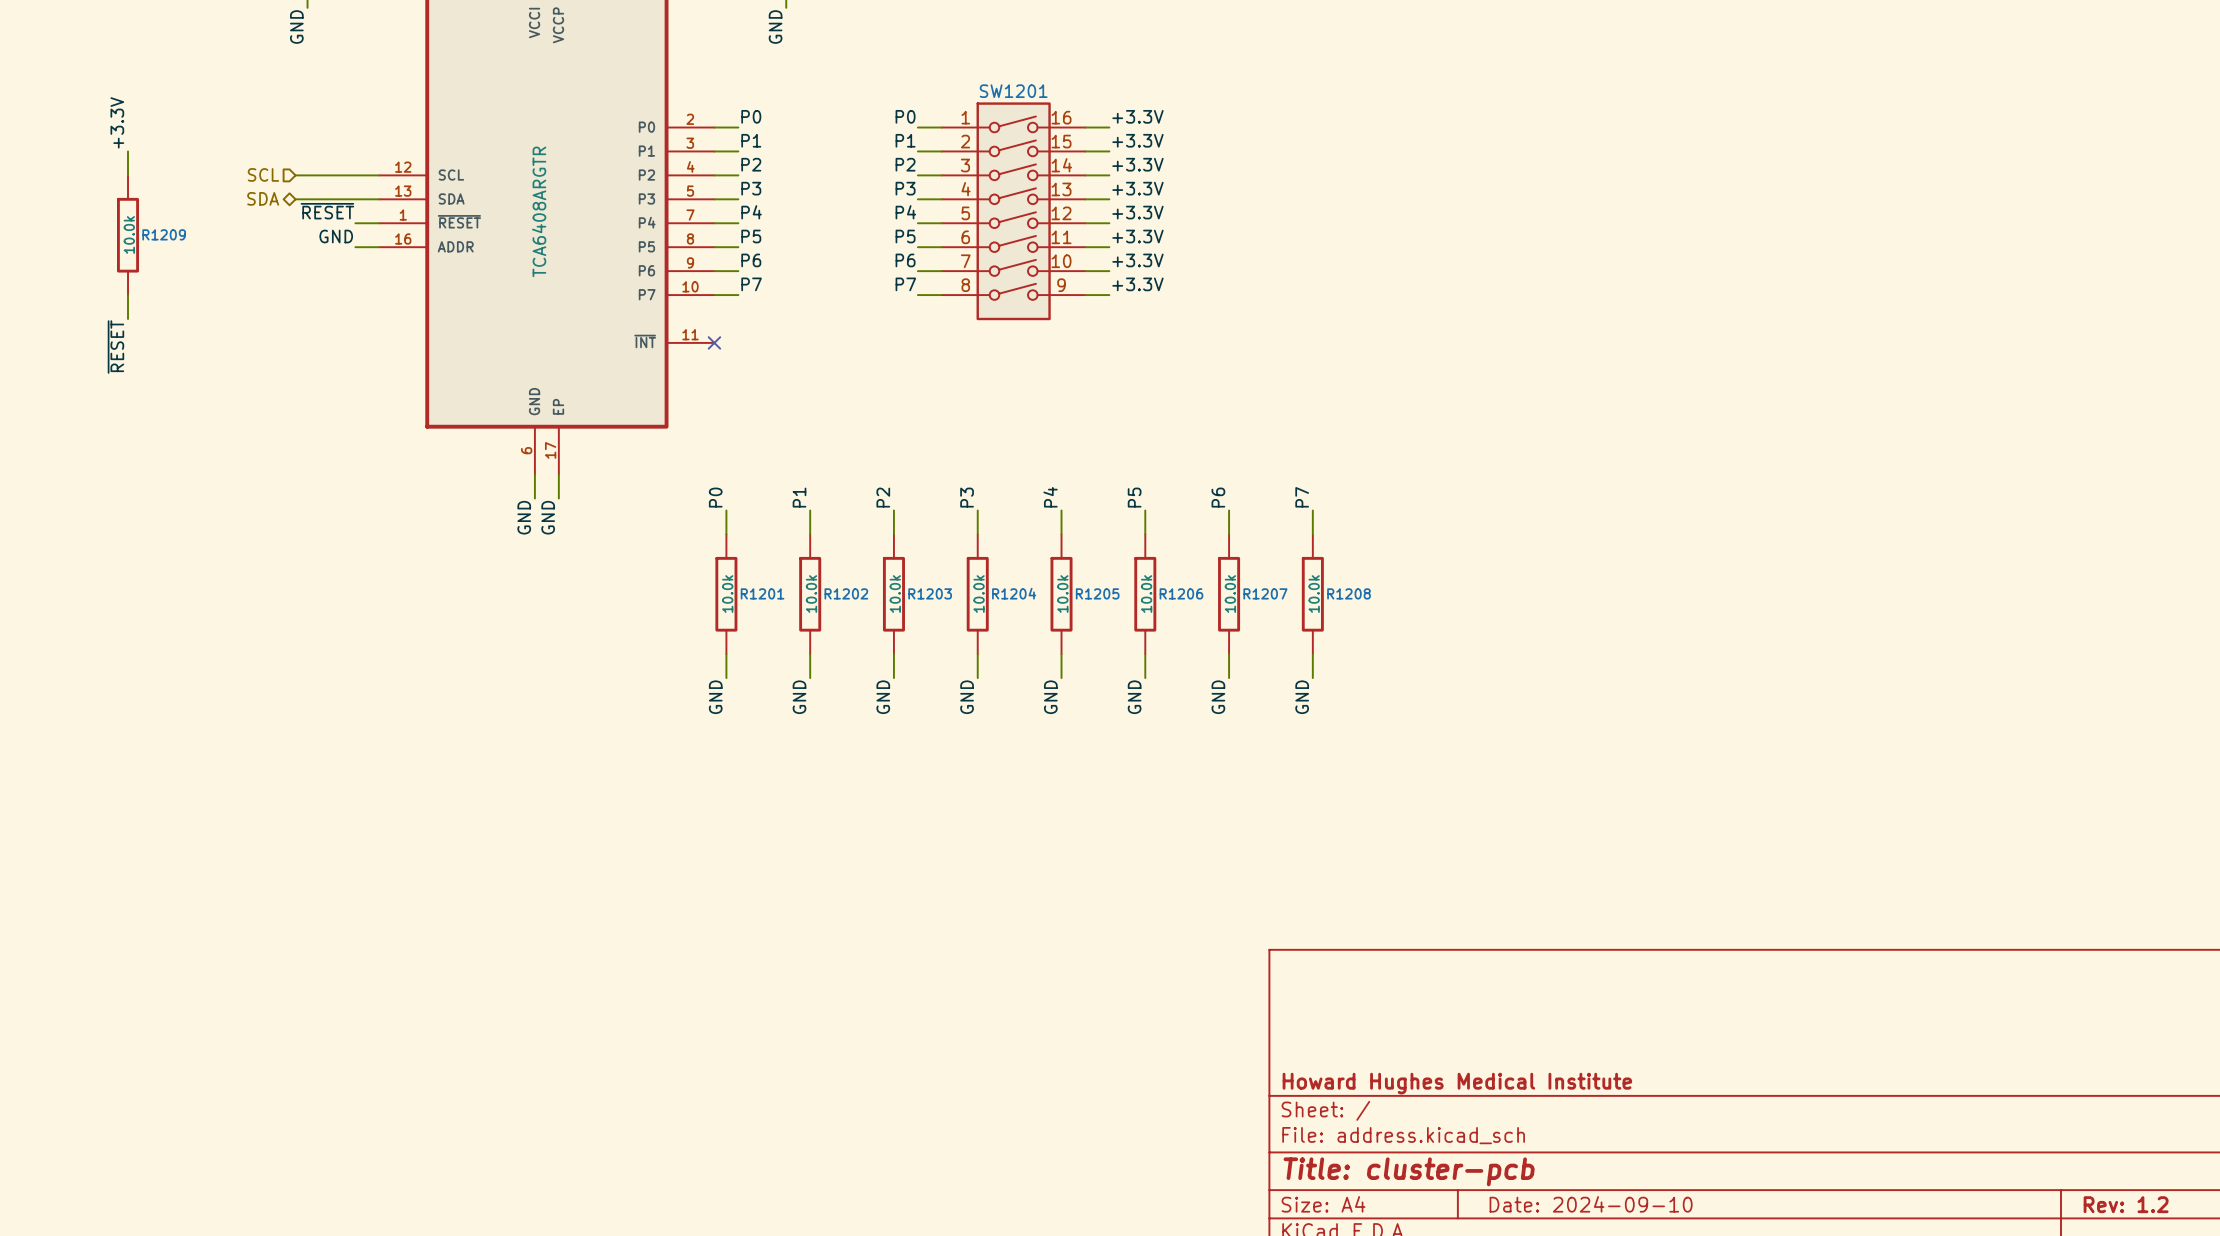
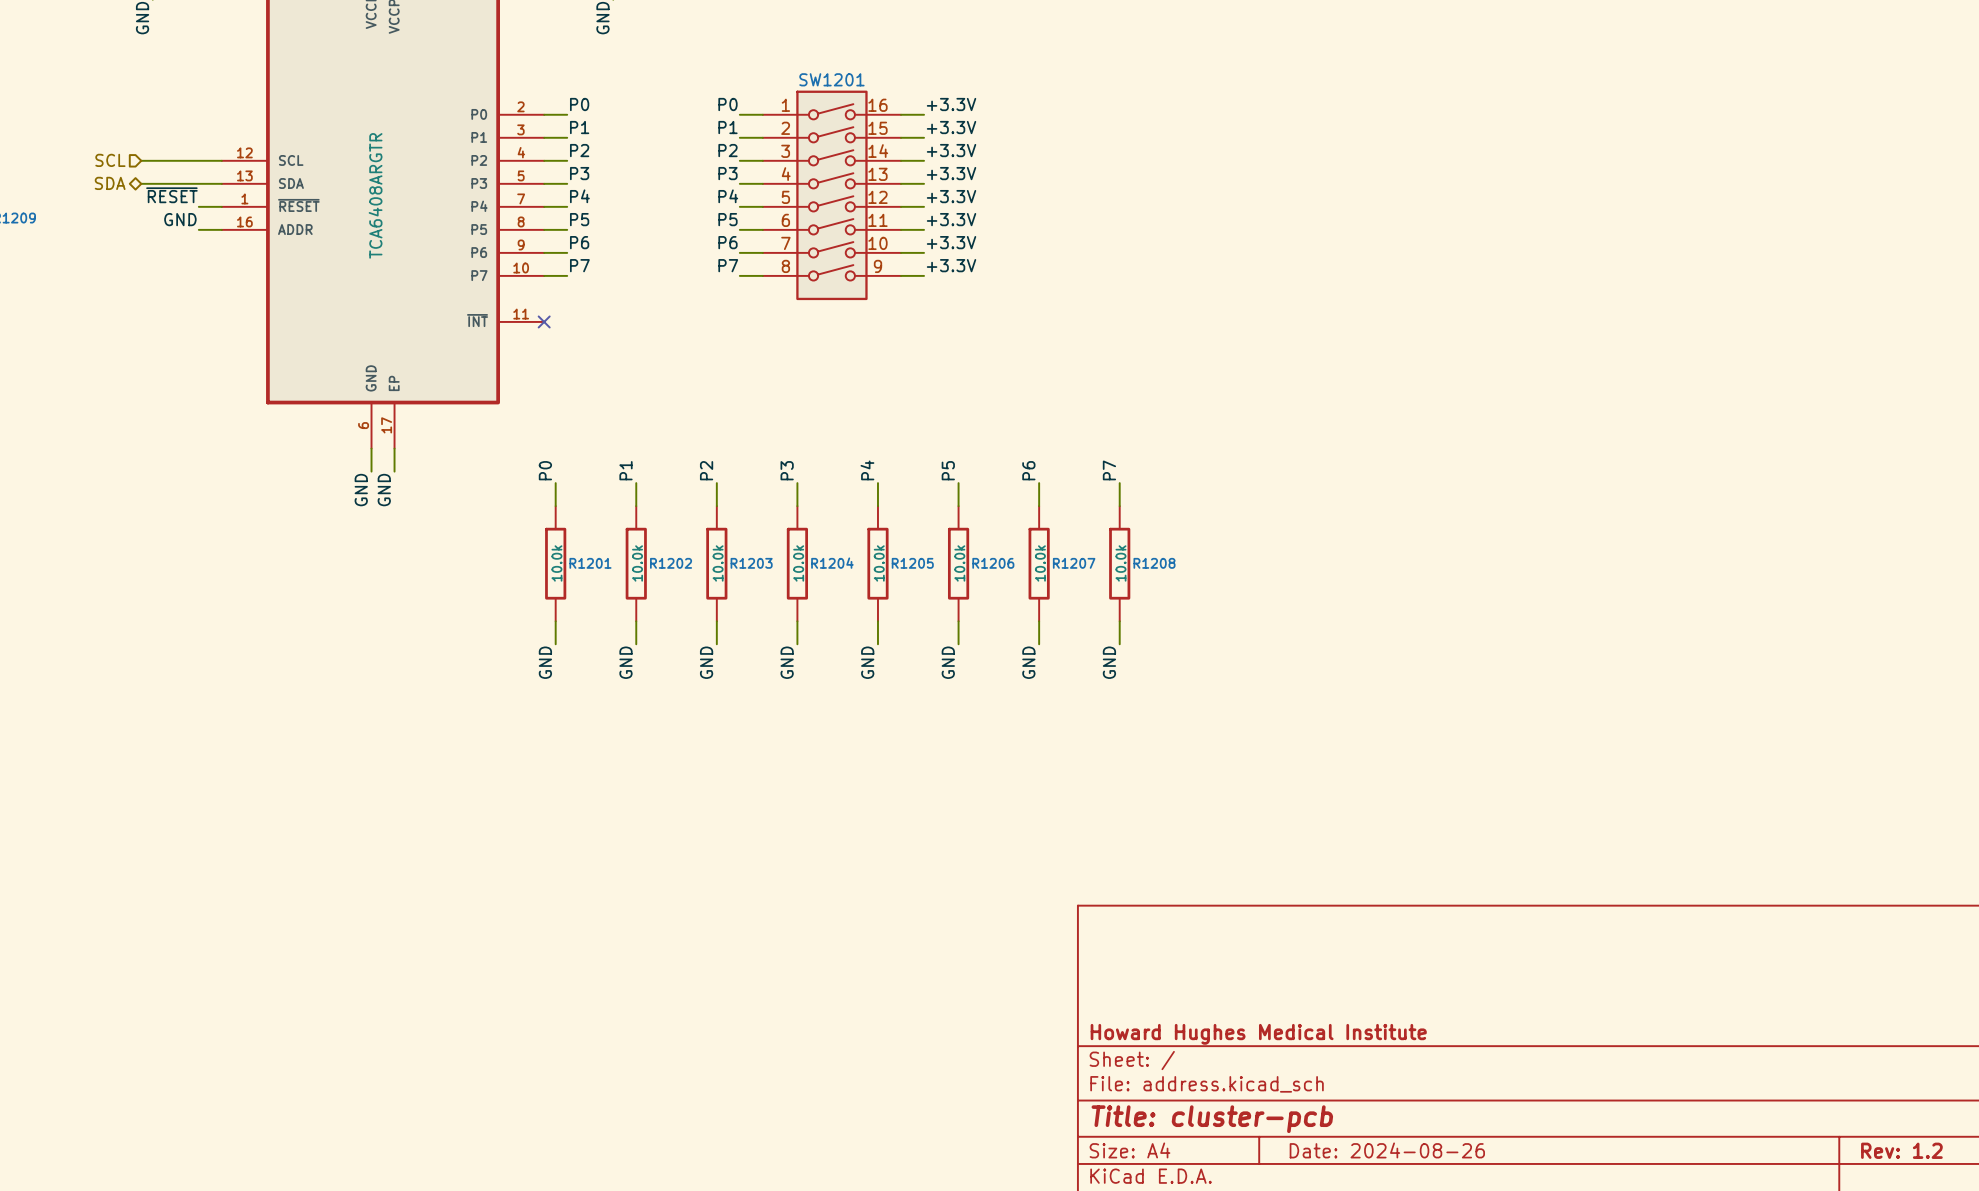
title block: Date: 2024-09-10 (1591, 1204) -> Date: 2024-08-26 (1387, 1150)

